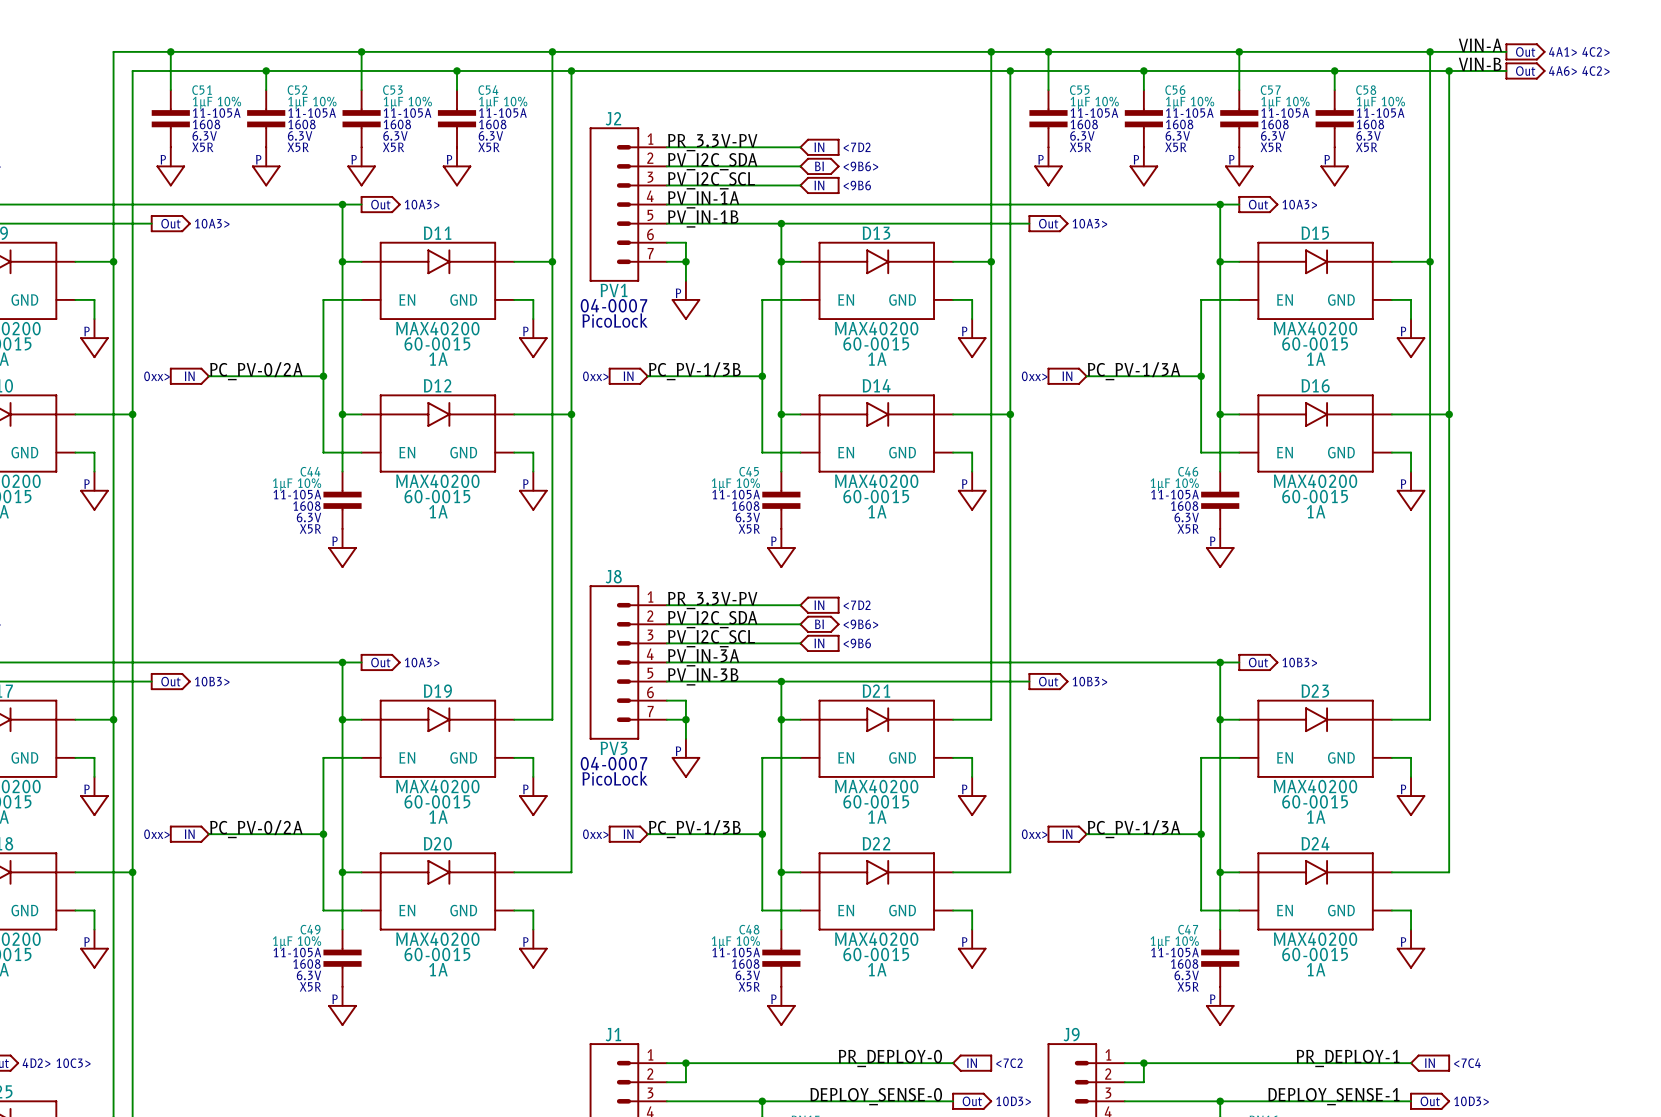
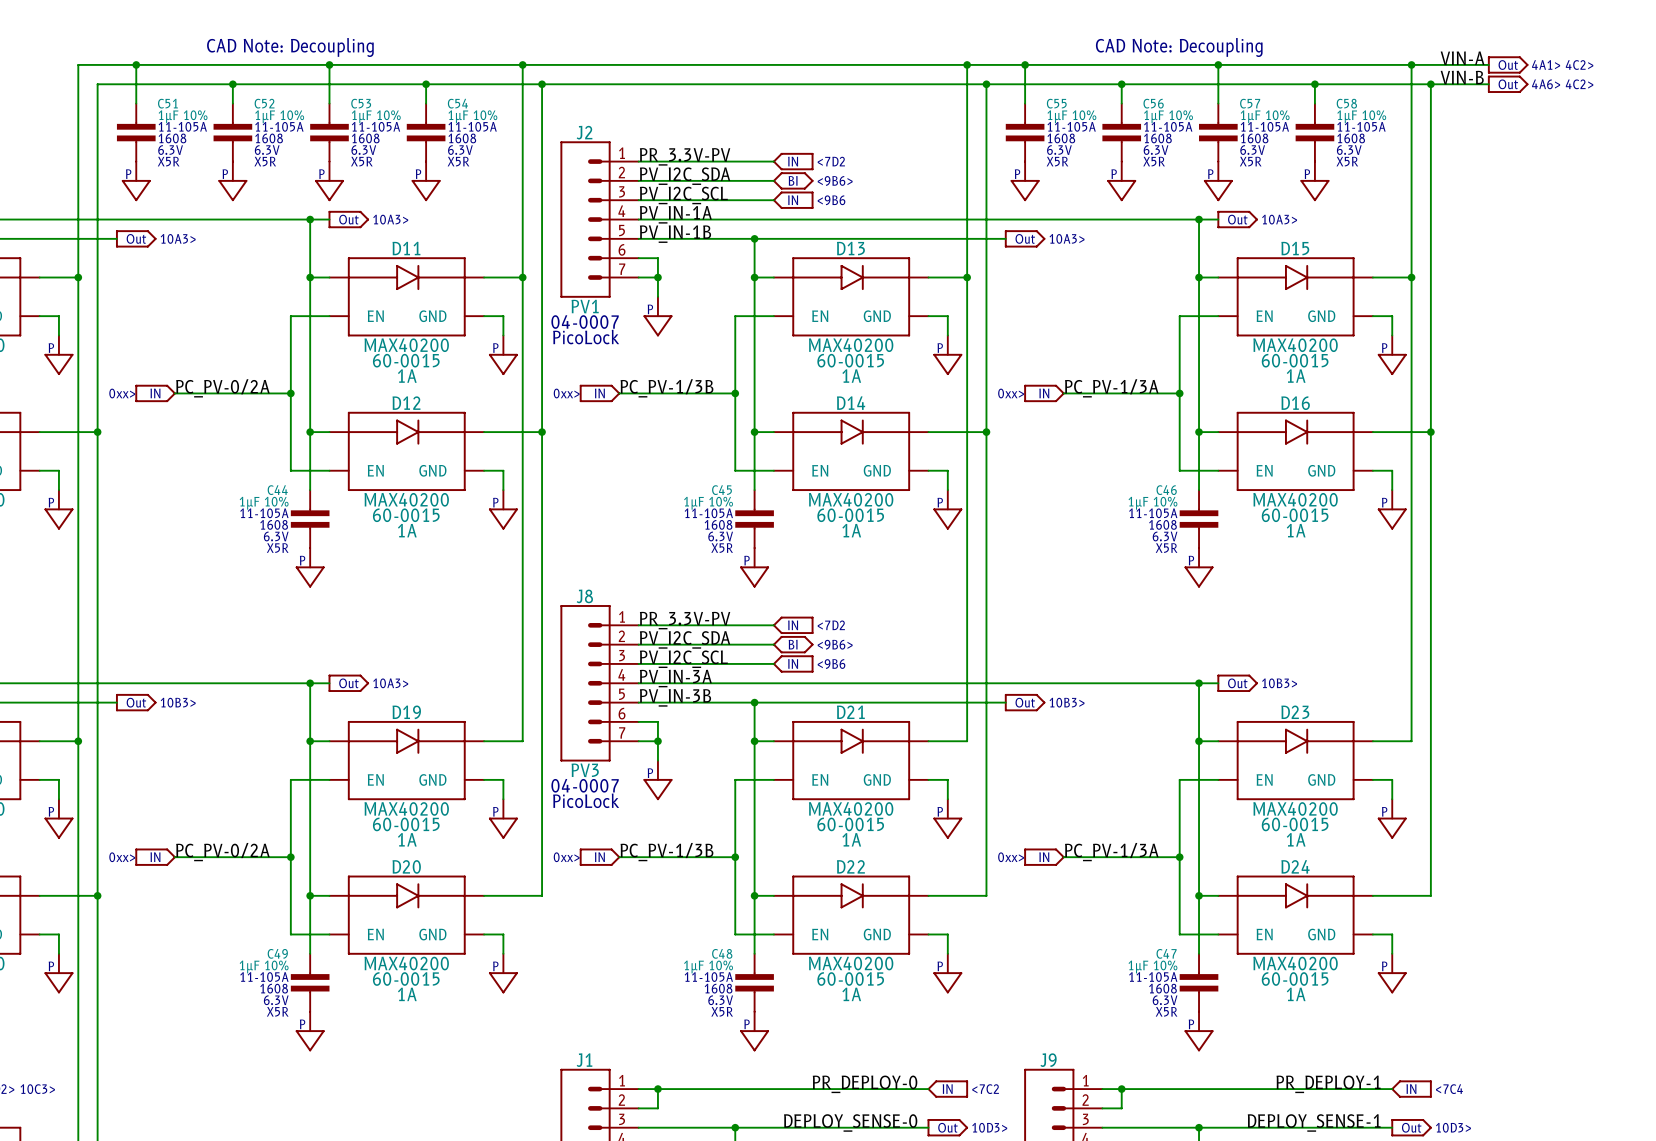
text: none -> CAD Note: Decoupling (290, 47)
text: none -> CAD Note: Decoupling (1179, 47)

